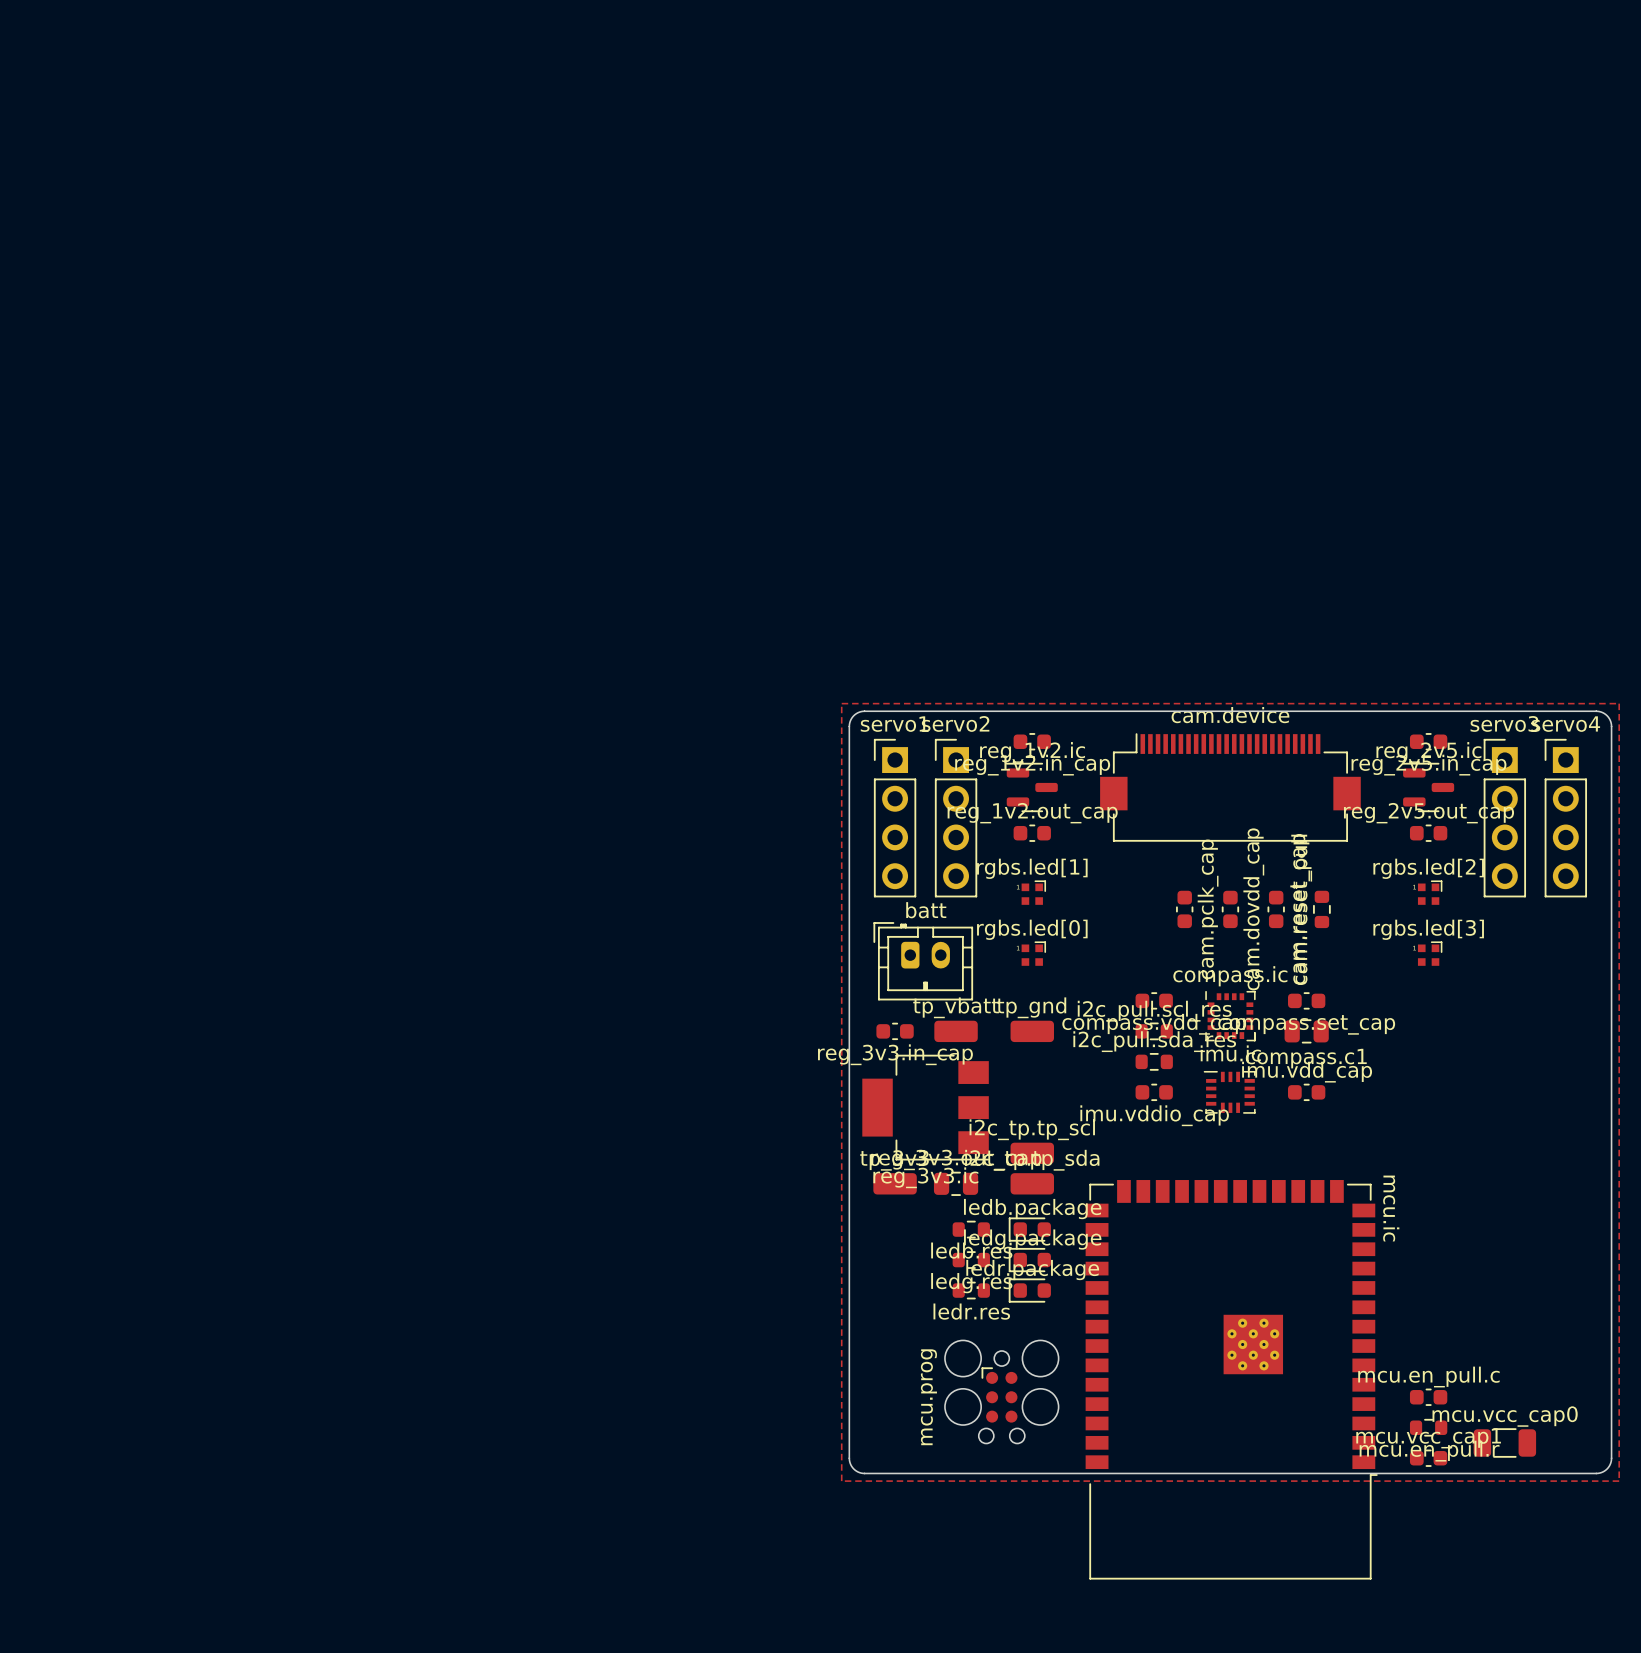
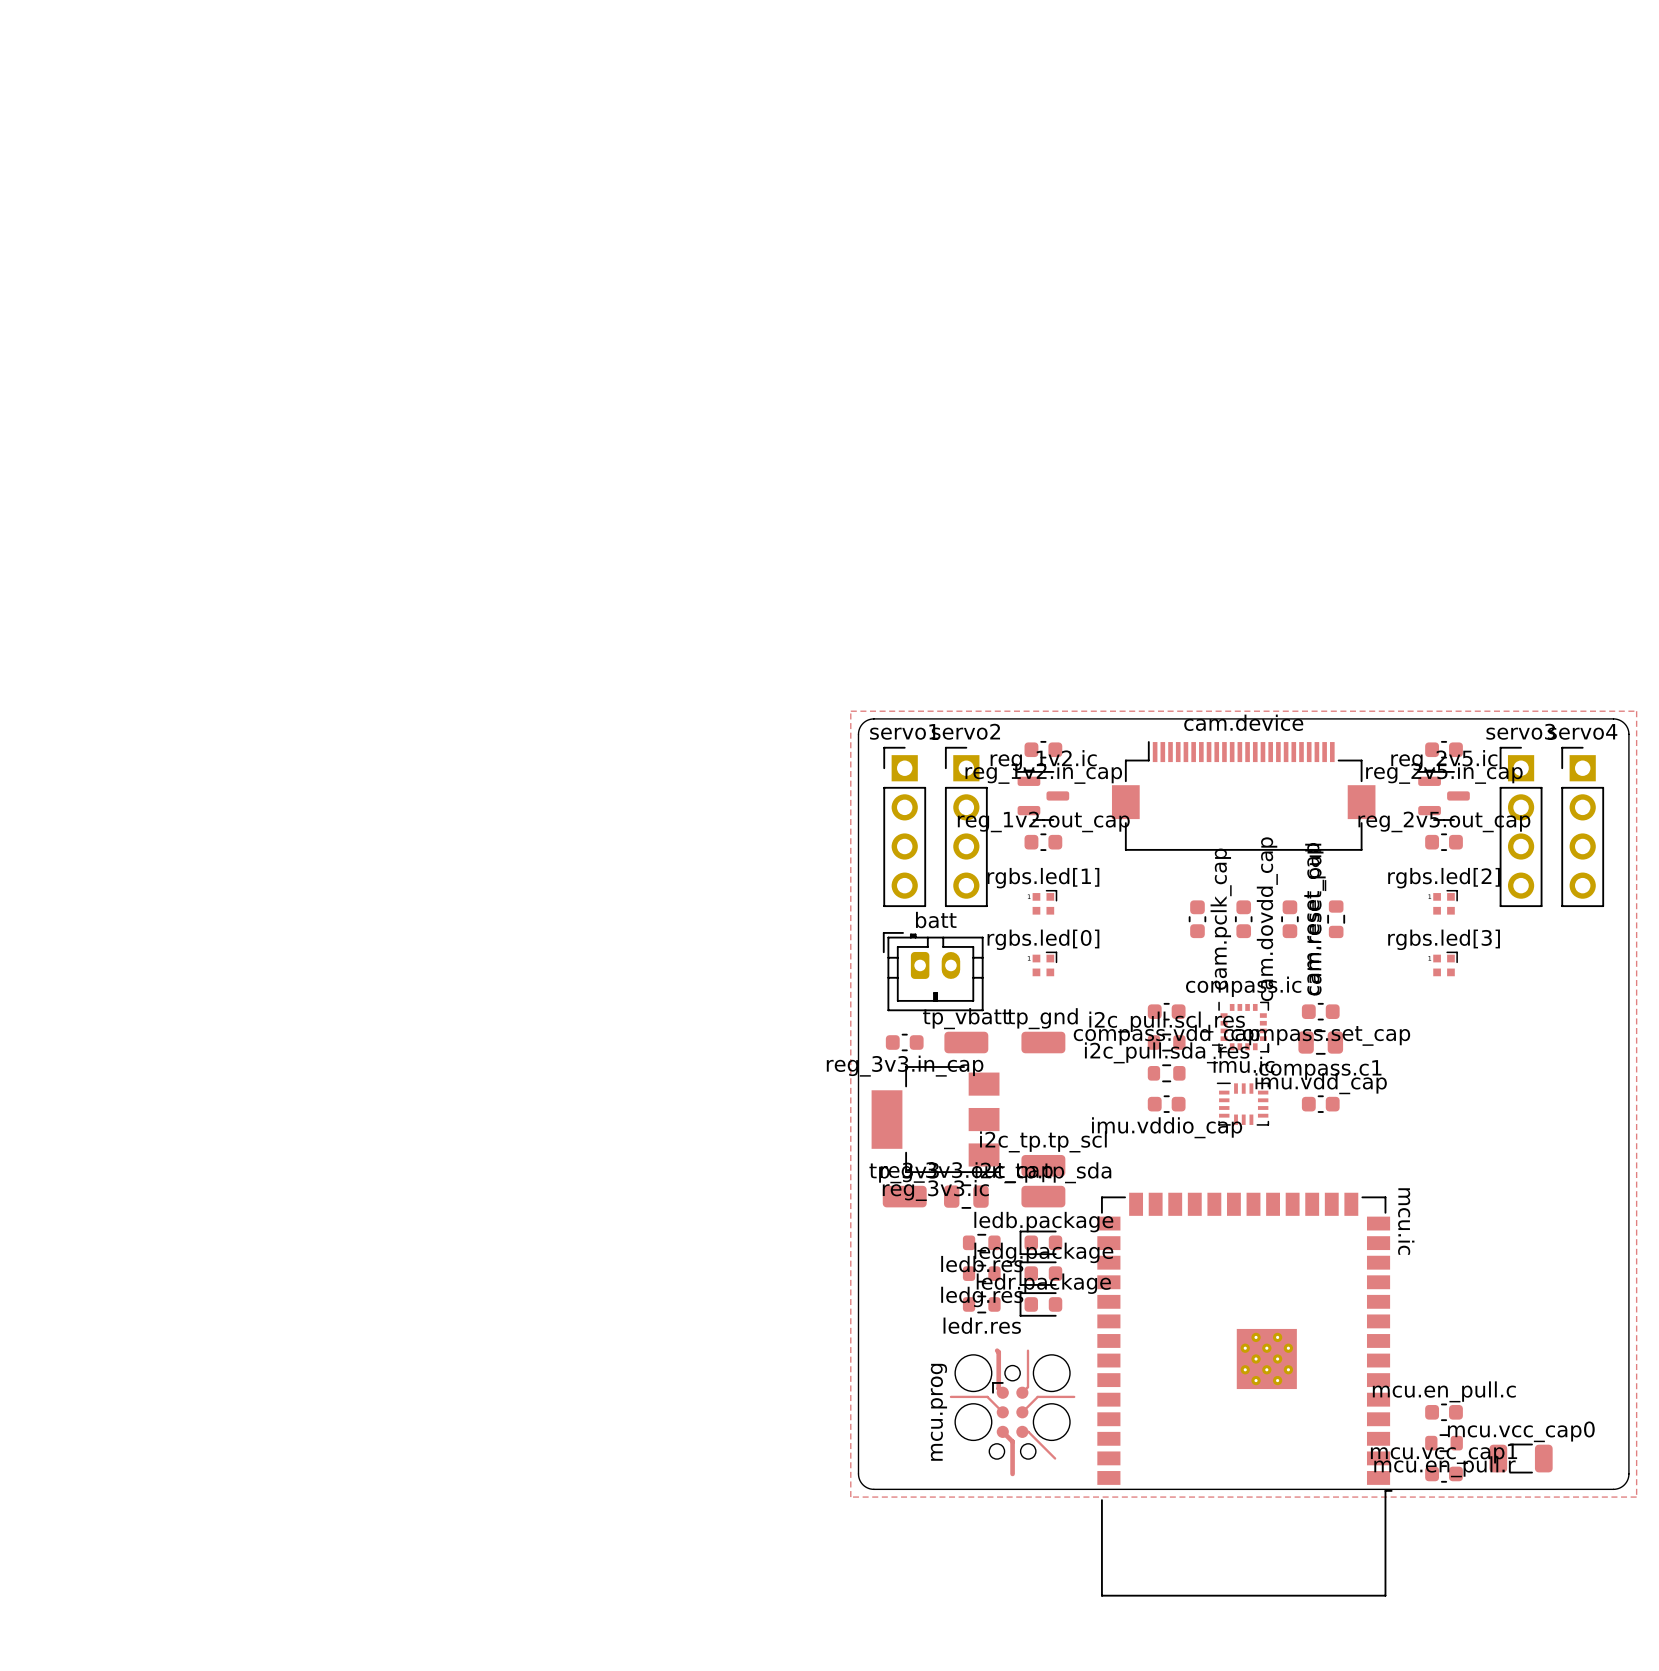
track: none -> (997, 1350) (998, 1388) (1002, 1392)
track: none -> (1027, 1350) (1027, 1387) (1022, 1392)
track: none -> (950, 1396) (987, 1396) (1002, 1412)
track: none -> (1074, 1396) (1037, 1396) (1022, 1412)
track: none -> (1002, 1431) (1012, 1441) (1012, 1473)
track: none -> (1022, 1431) (1028, 1431) (1055, 1458)

